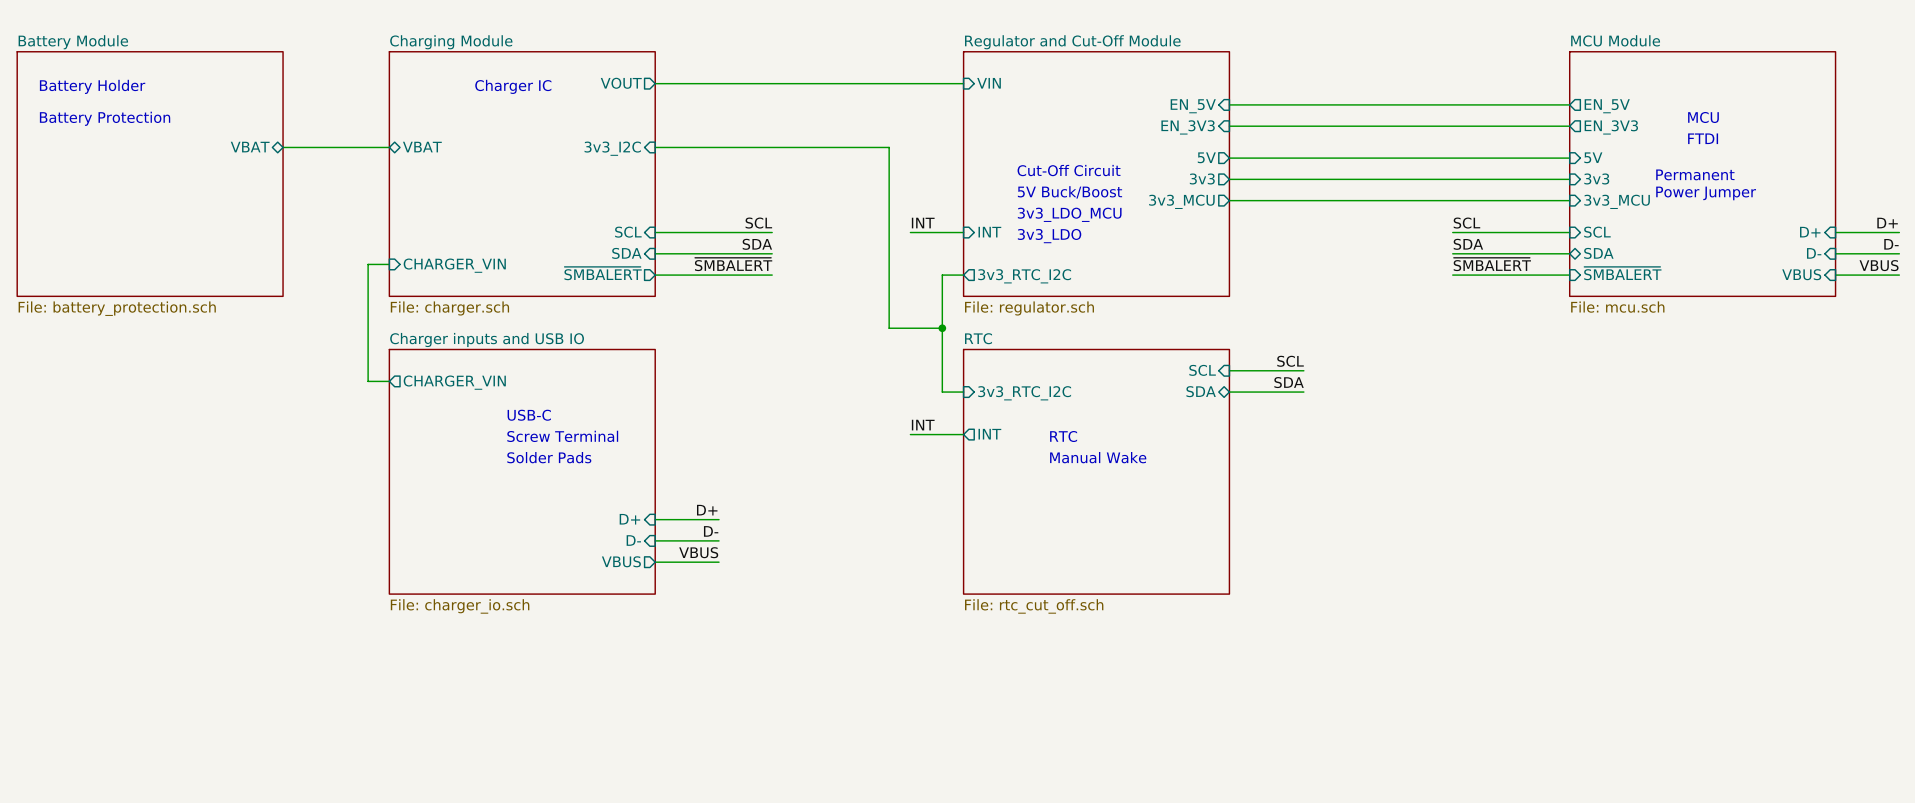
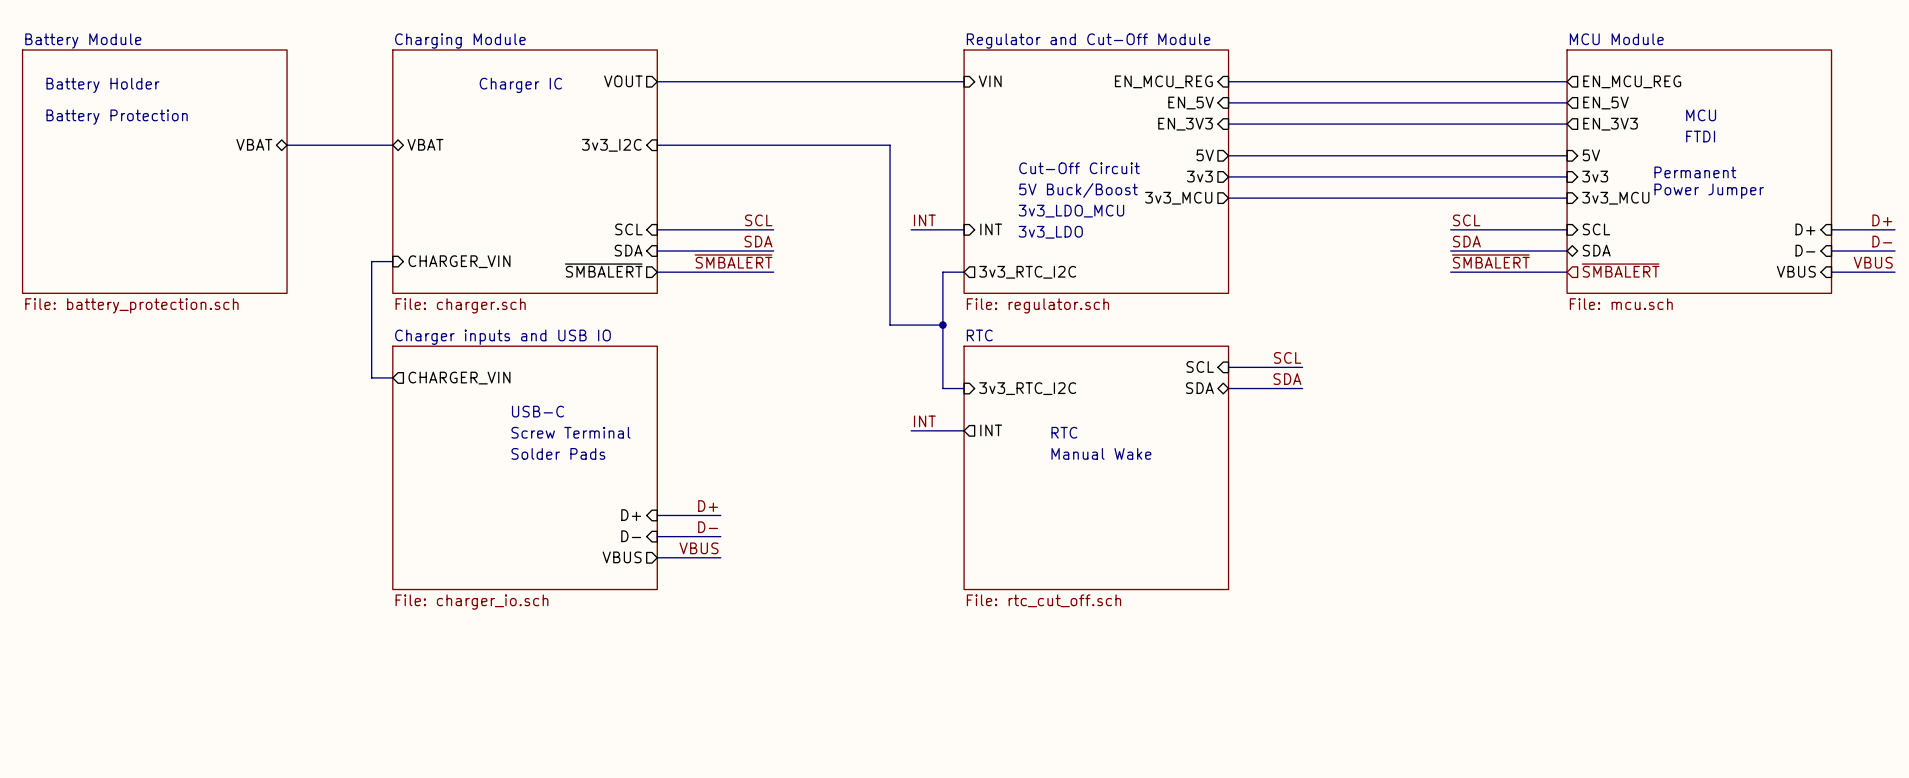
wire: none -> (1228, 81) (1567, 81)
sheet pin: none -> EN_MCU_REG (1163, 81)
sheet pin: none -> EN_MCU_REG (1632, 81)
sheet pin: ~{SMBALERT} (1622, 273) -> none
hierarchical label: none -> ~{SMBALERT} (1620, 270)

